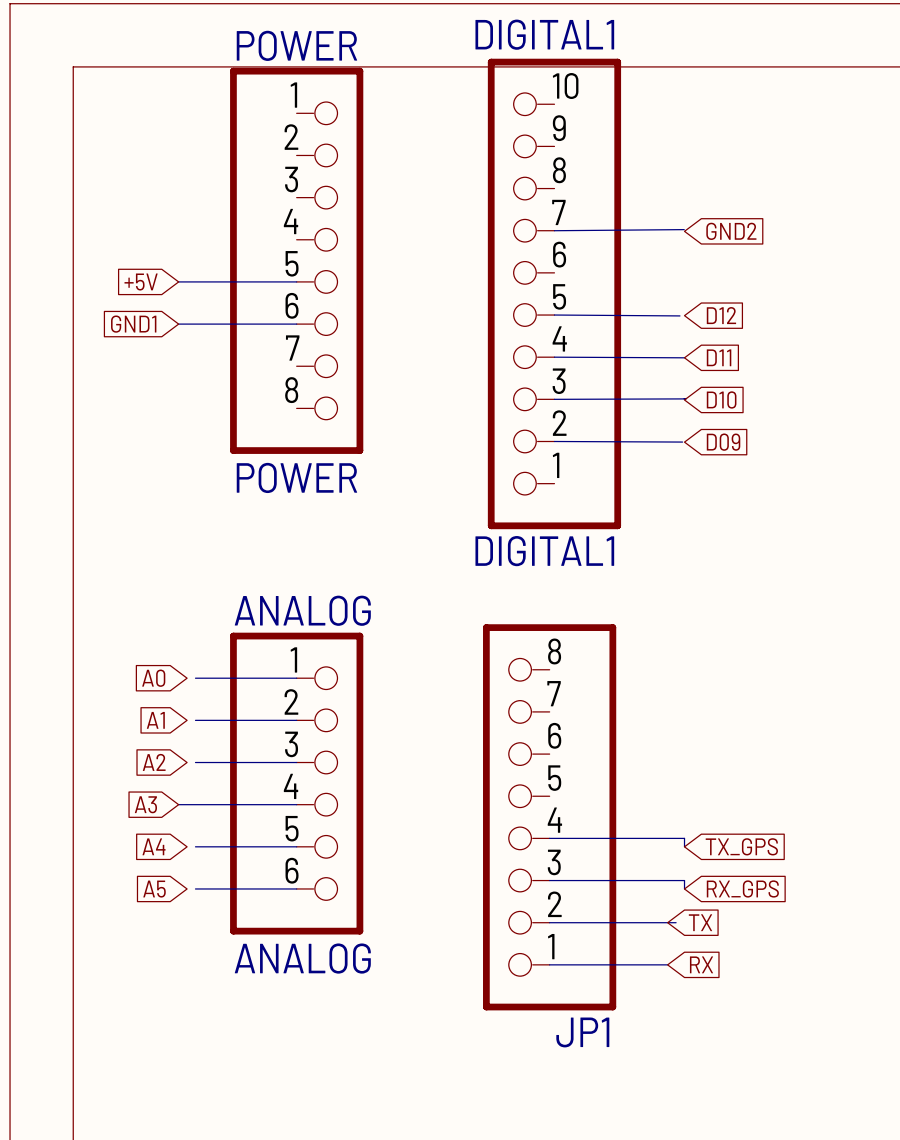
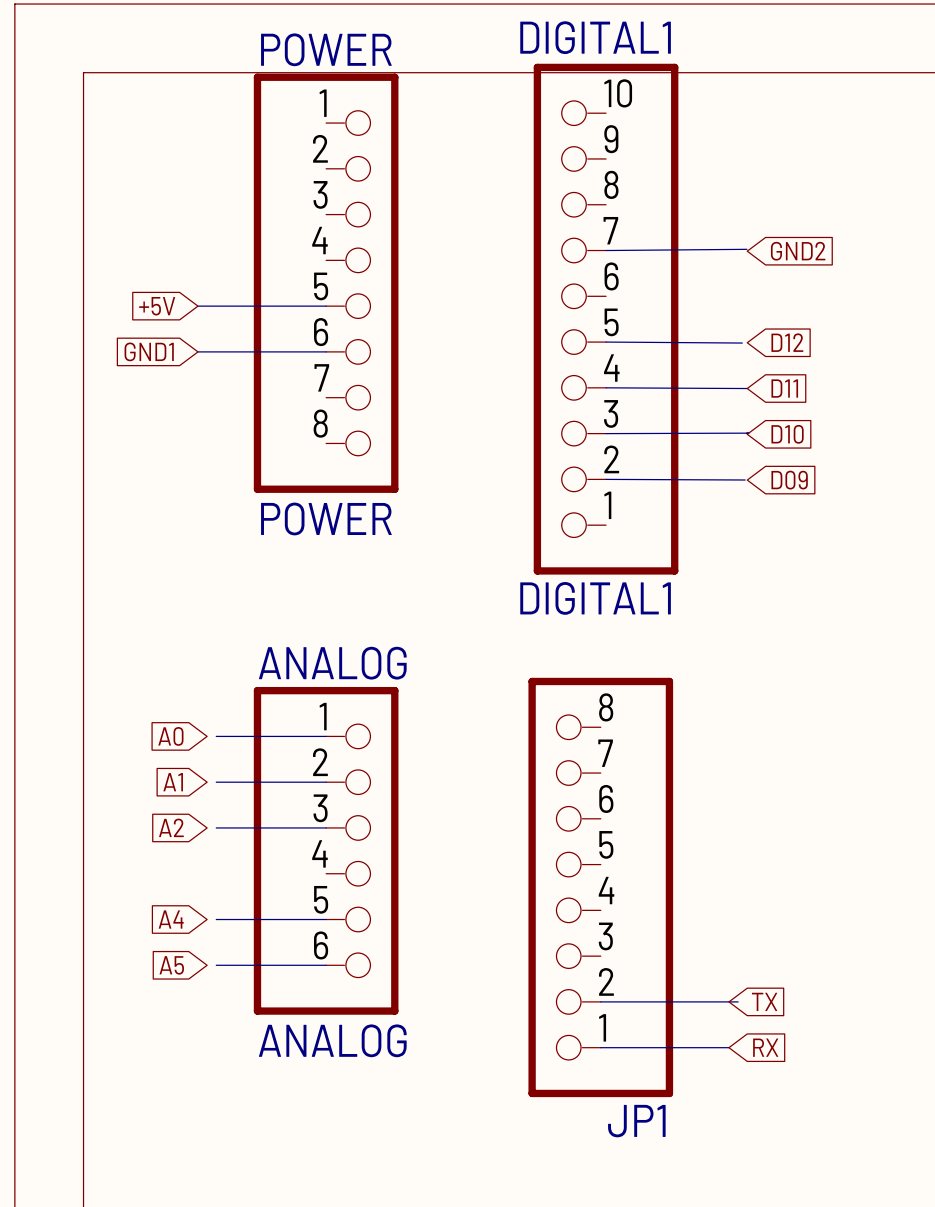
global label: A3 (145, 804) -> none
wire: (178, 804) (296, 804) -> none
wire: (549, 838) (684, 838) (684, 846) -> none
global label: TX_GPS (741, 846) -> none
wire: (549, 880) (684, 880) (684, 888) -> none
global label: RX_GPS (742, 888) -> none

